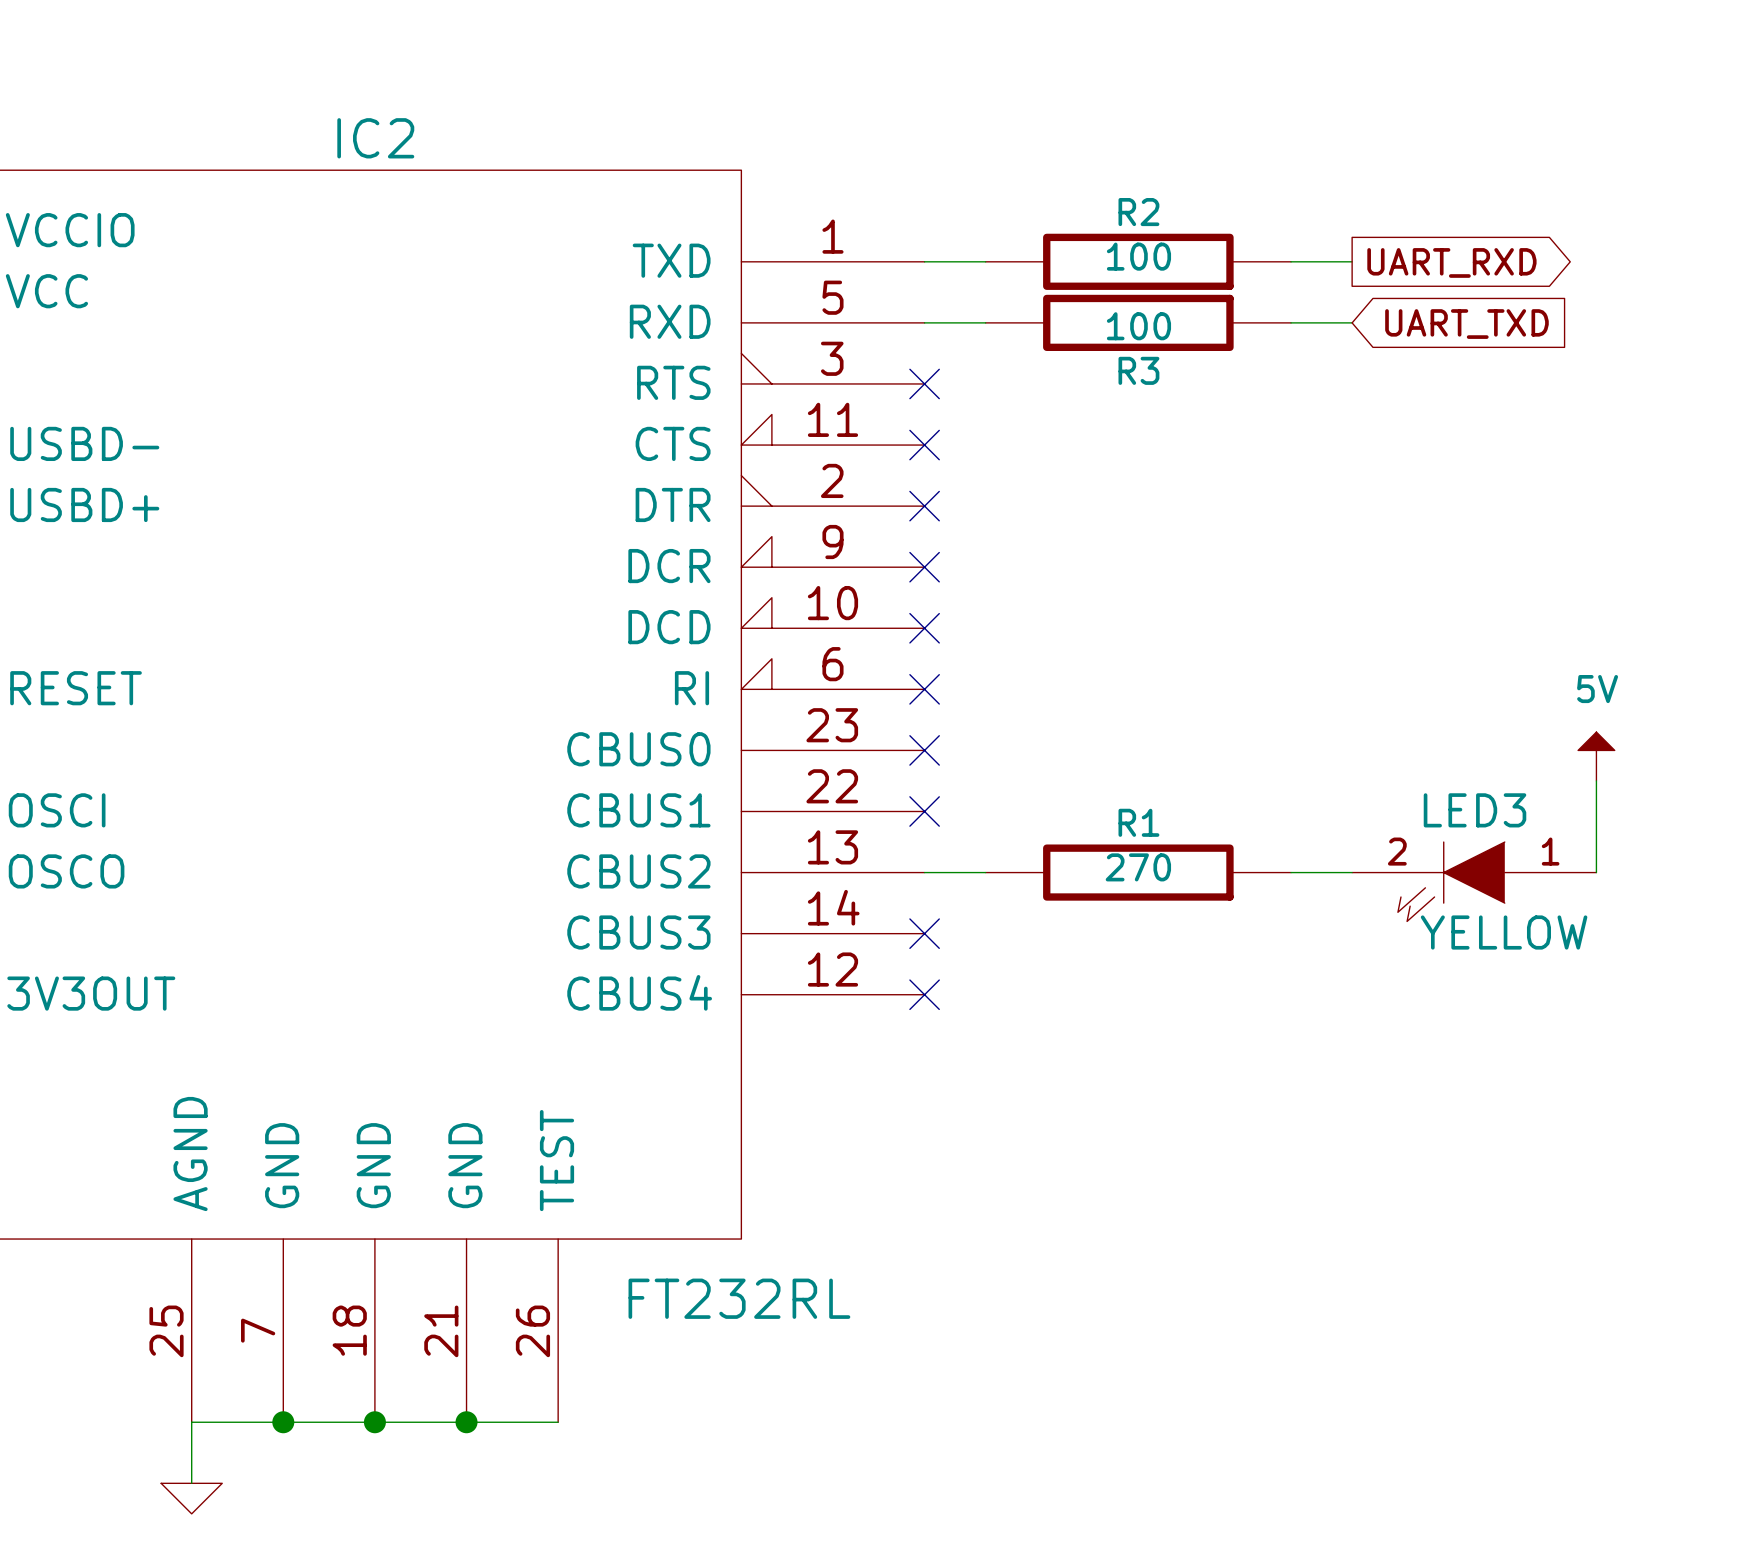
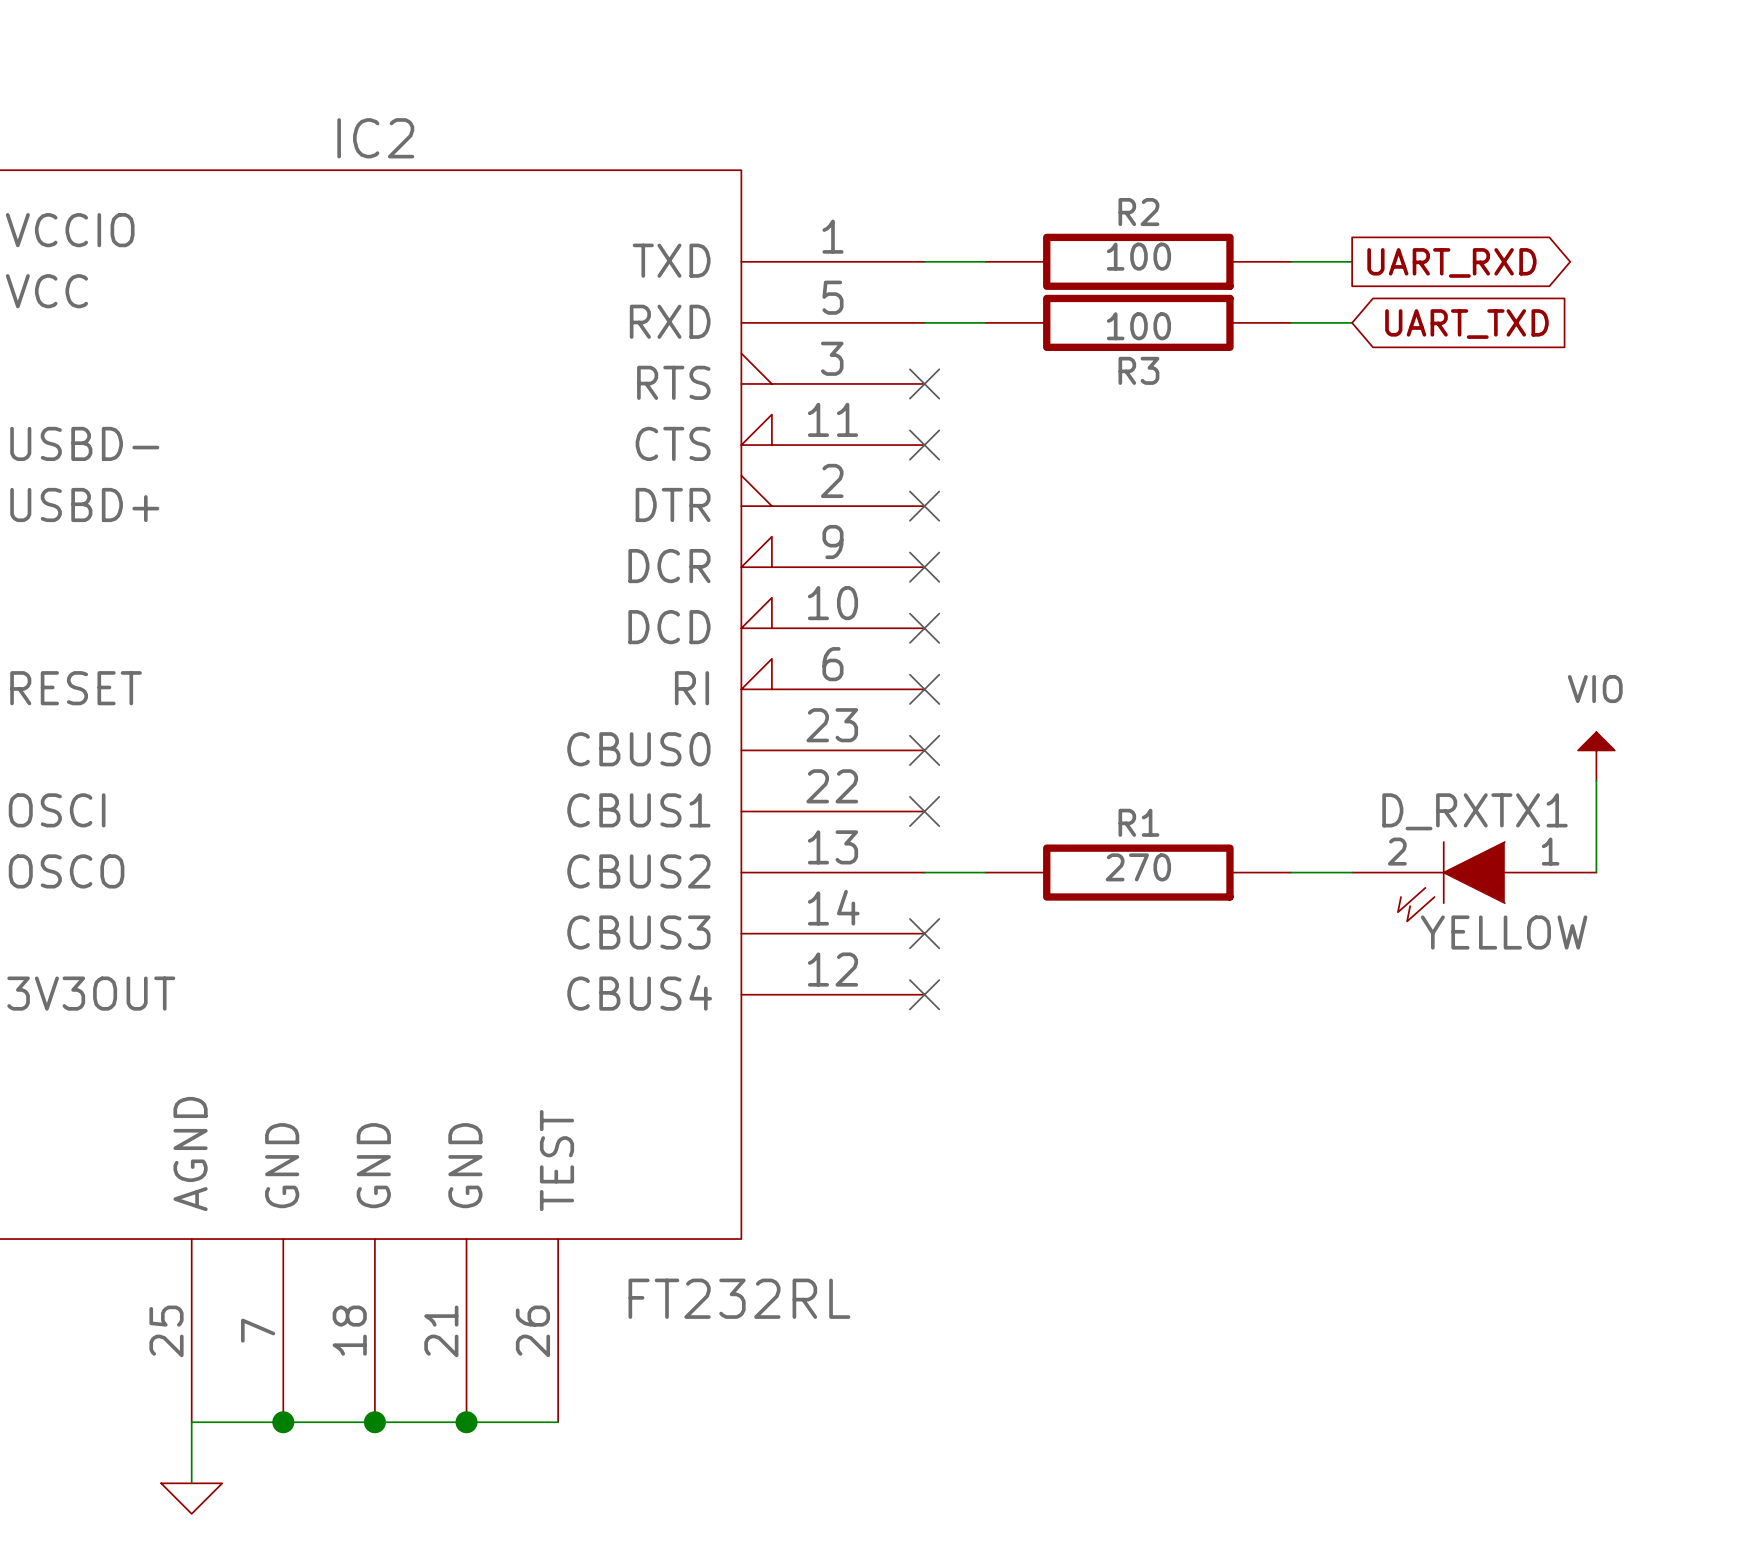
power symbol: 5V (1596, 756) -> VIO (1596, 756)
LED3 name: LED3 (1475, 810) -> D_RXTX1 (1475, 811)

